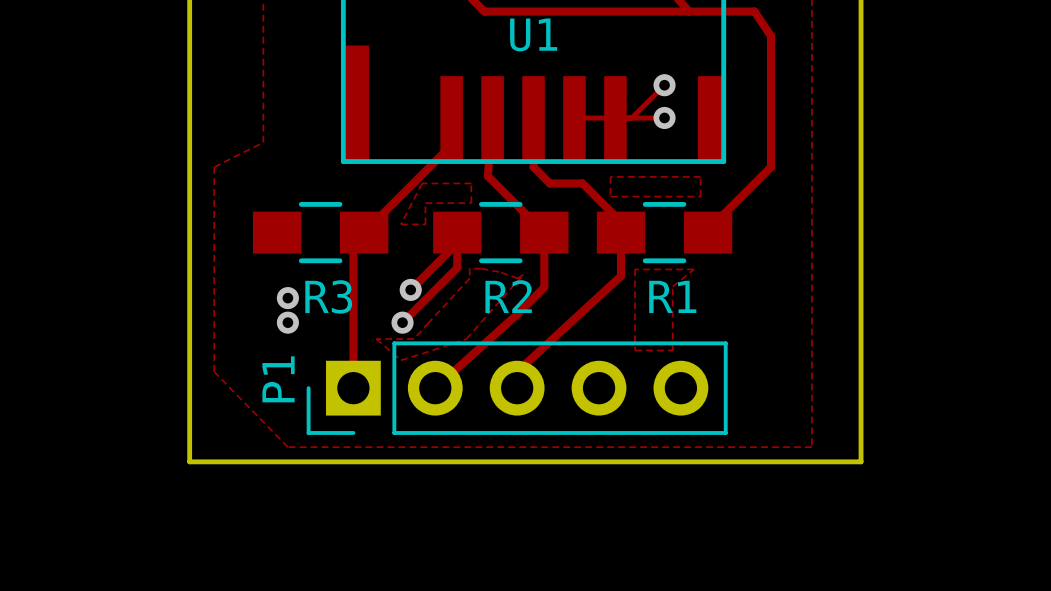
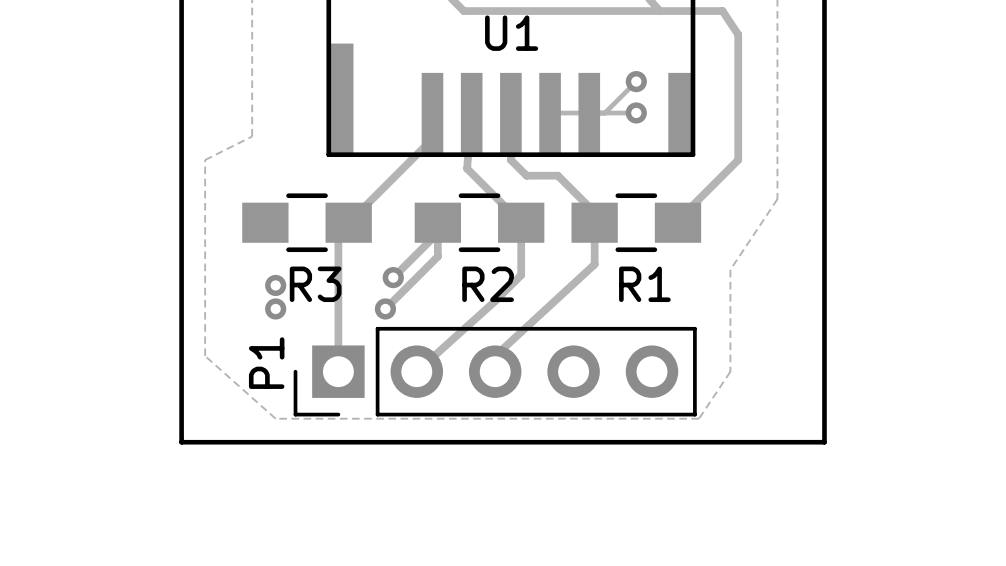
zone outline: (610, 176) (610, 196) (700, 196) (700, 176) (610, 176) -> none
zone outline: (422, 183) (400, 224) (425, 224) (425, 203) (471, 203) (471, 183) (422, 183) -> none
zone outline: (811, 208) (811, 447) (287, 447) (214, 371) -> (777, 199) (730, 269) (730, 371) (699, 418) (275, 418) (205, 356)
zone outline: (469, 268) (469, 278) (413, 339) (376, 339) (400, 360) (466, 339) (523, 275) (517, 278) (499, 271) (469, 268) -> none
zone outline: (635, 269) (635, 350) (672, 350) (672, 286) (694, 269) (635, 269) -> none

